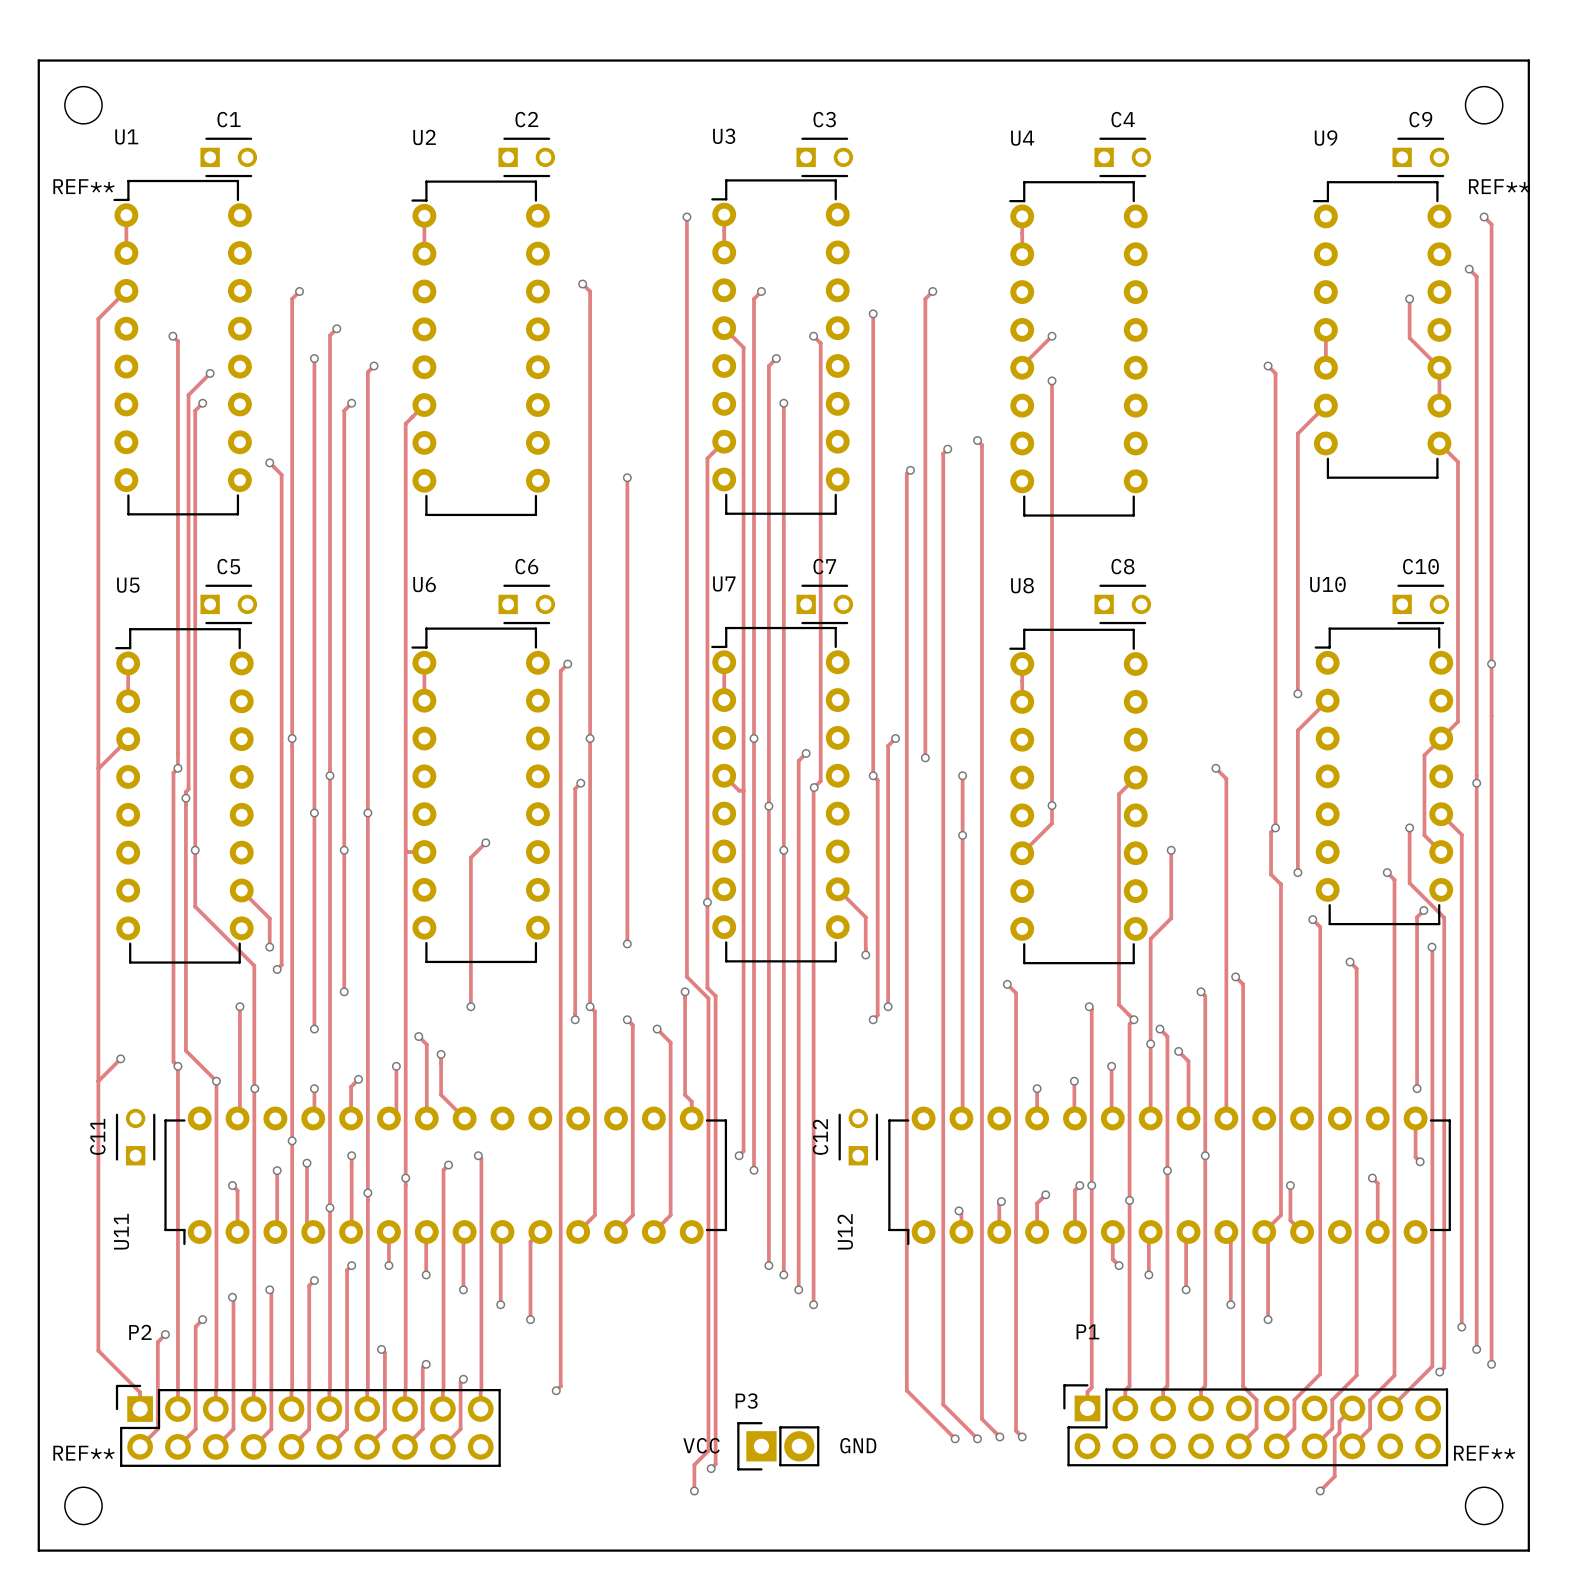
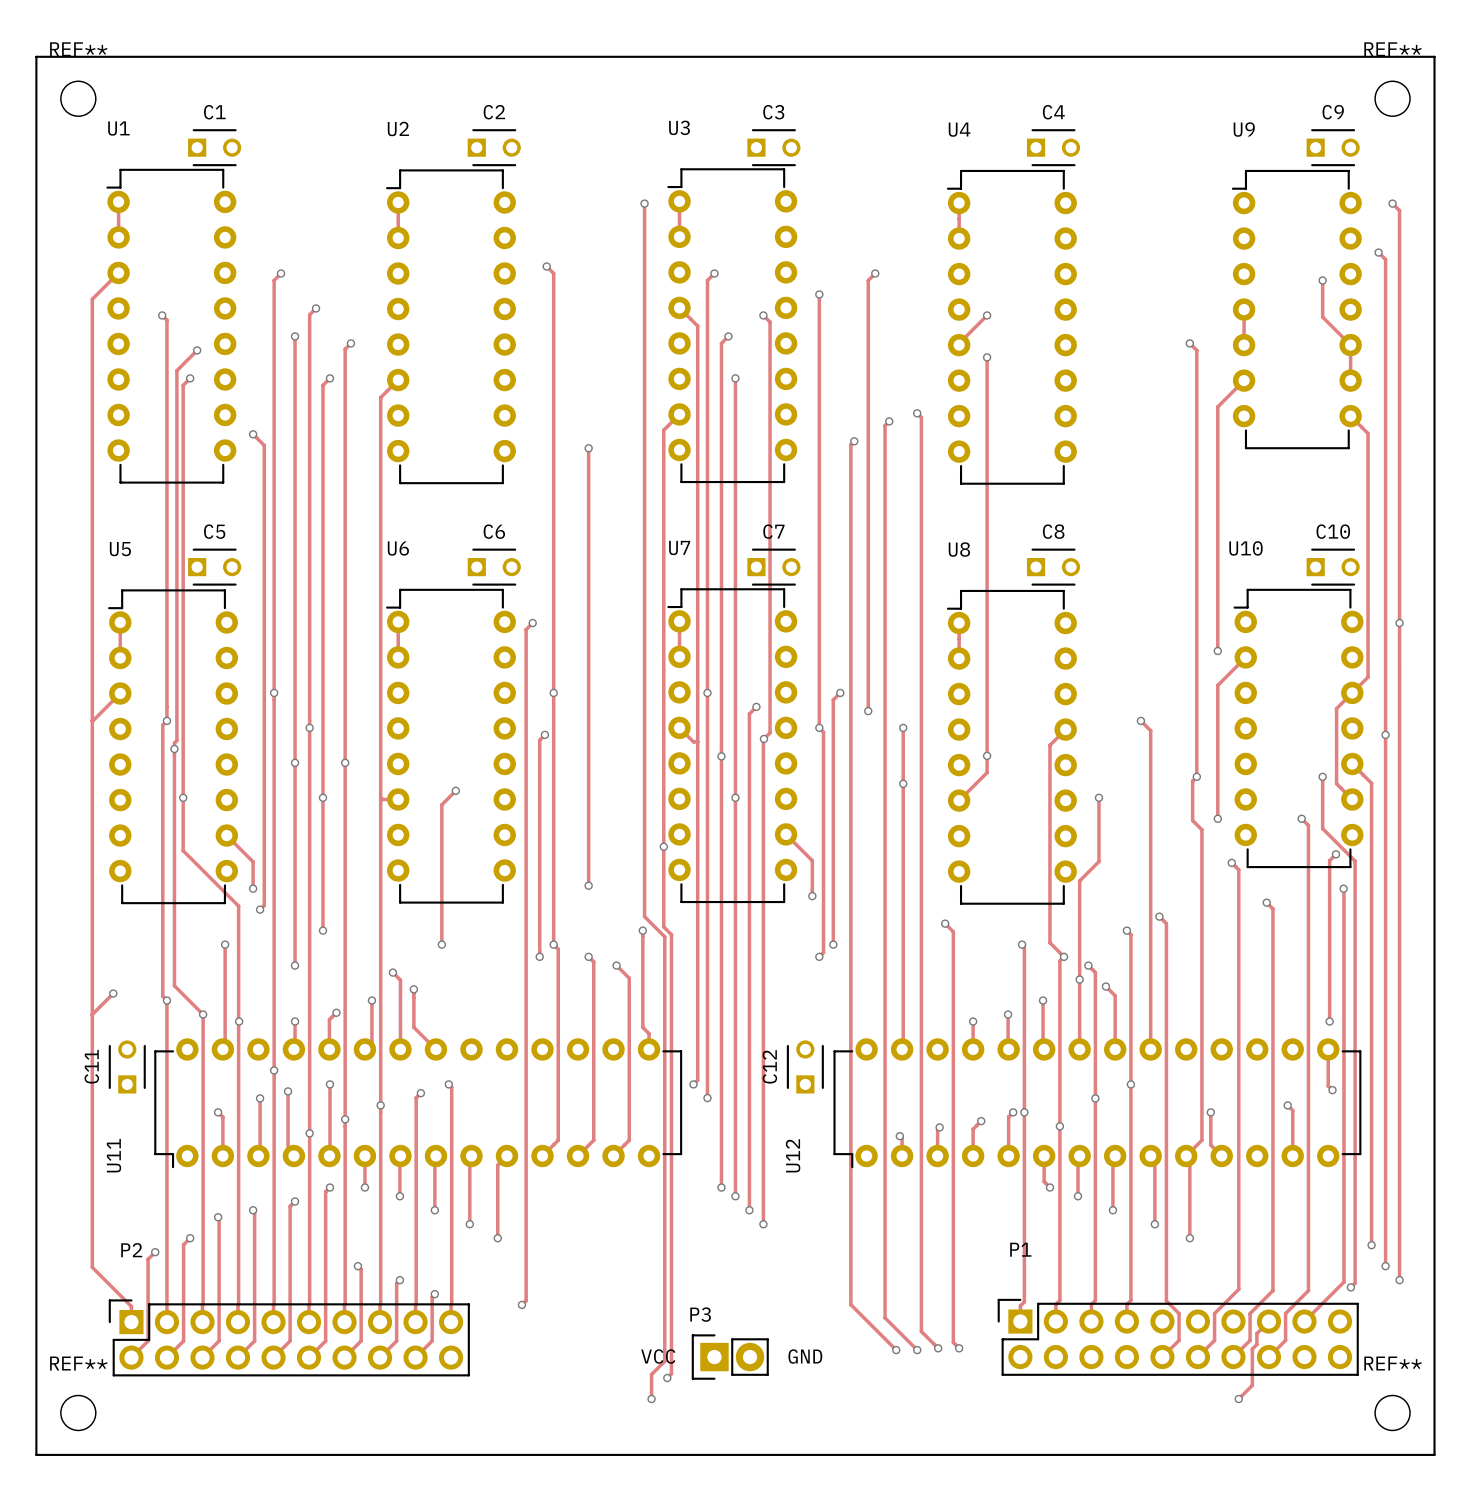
REF** name position: REF** (83, 186) -> REF** (78, 49)
REF** name position: REF** (1499, 186) -> REF** (1393, 49)

